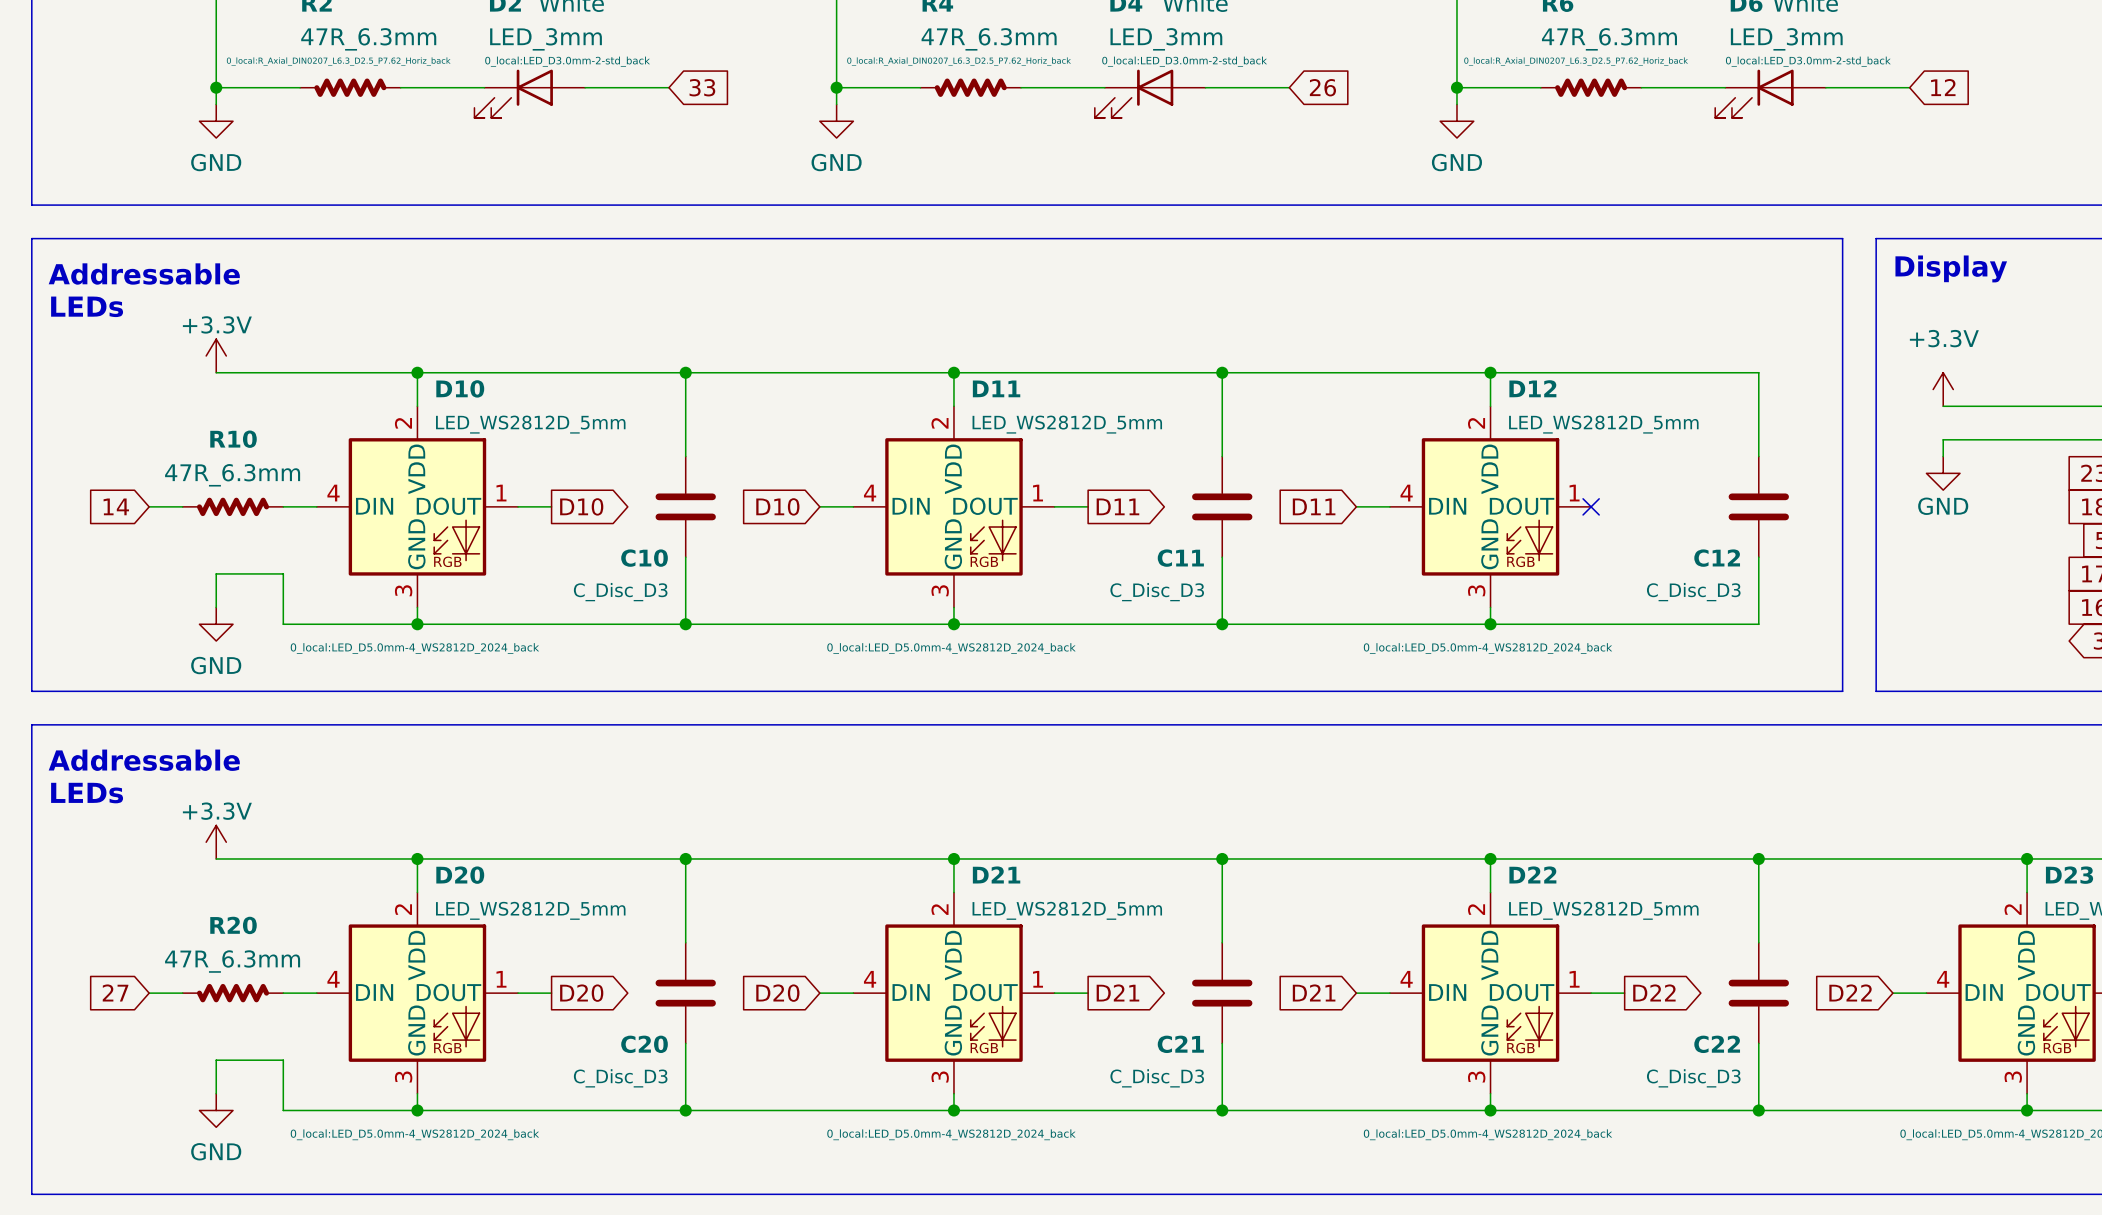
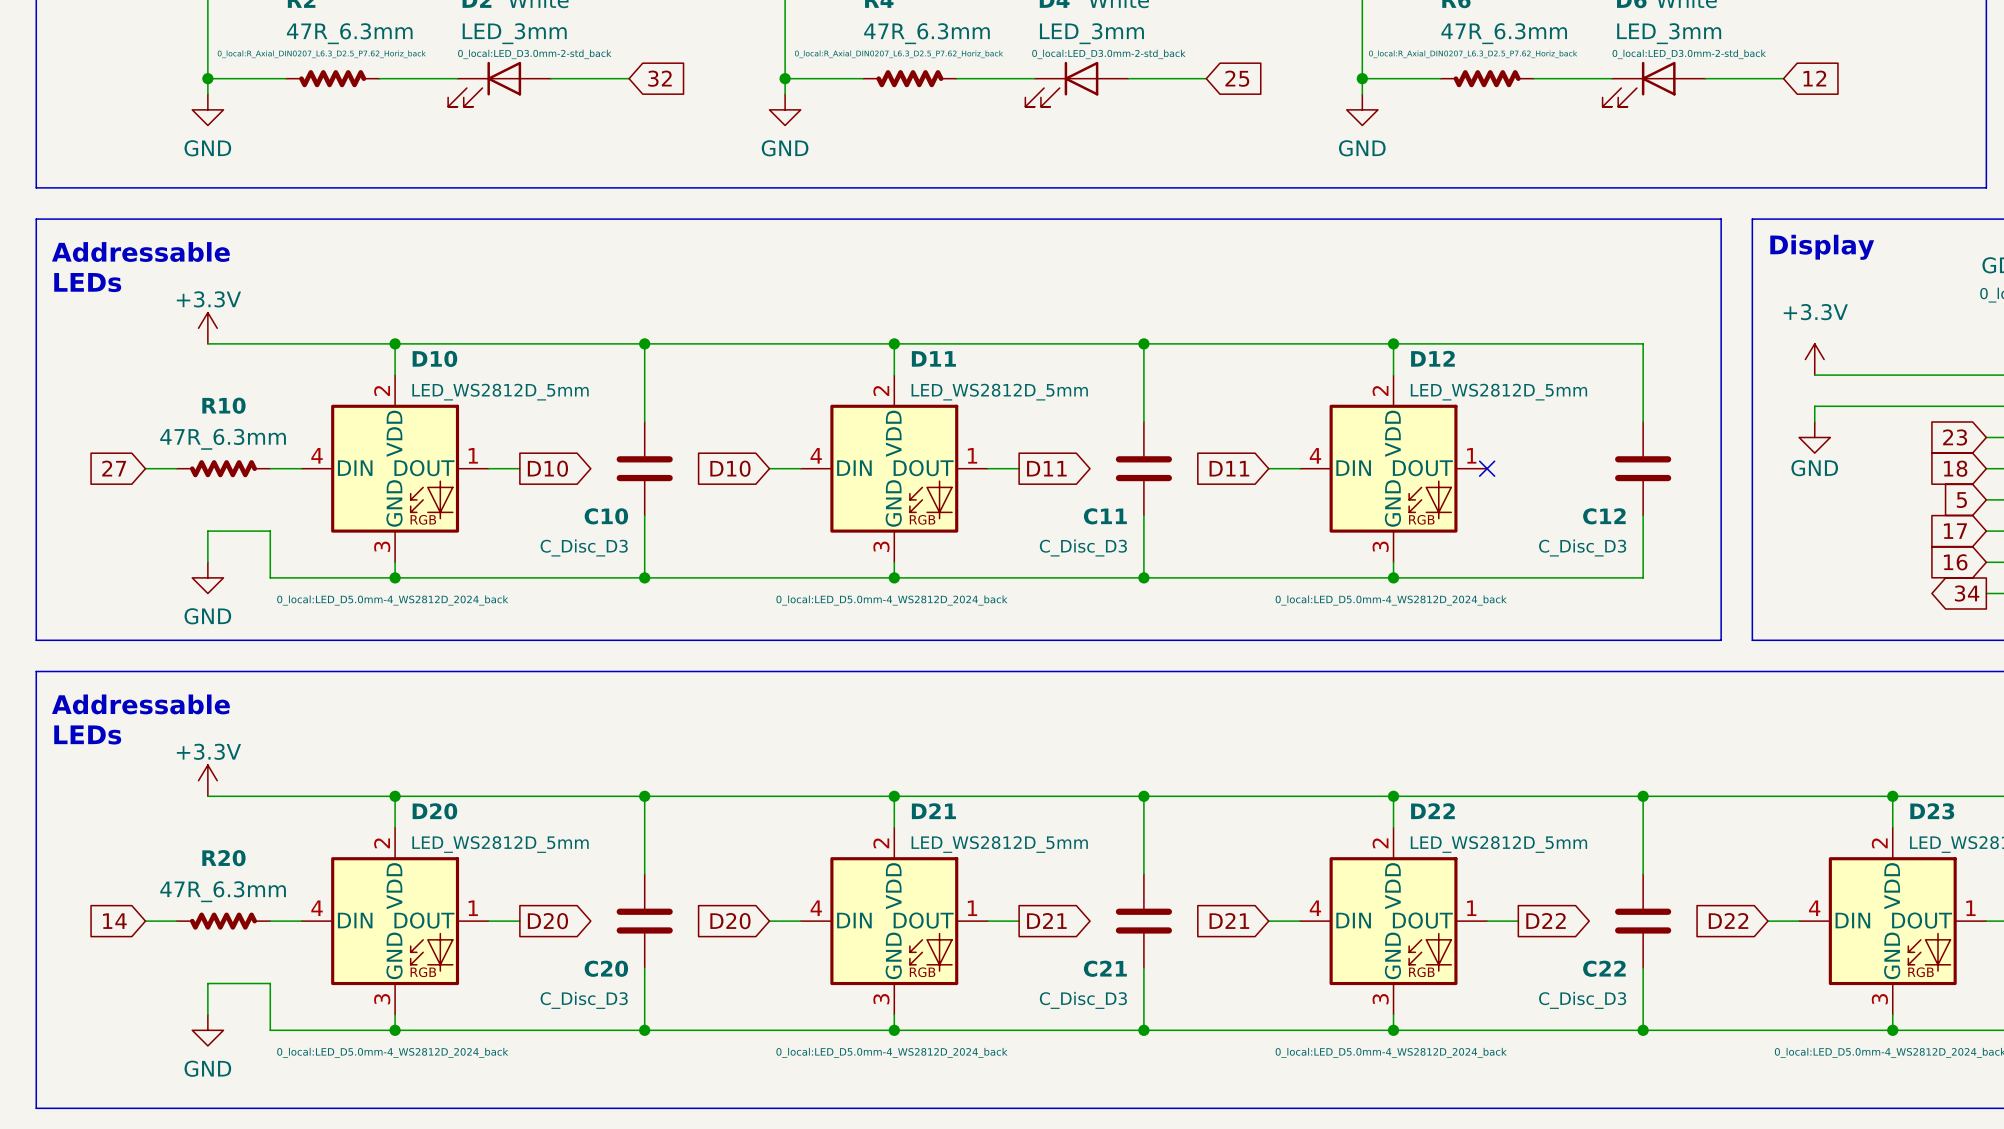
global label: 33 (702, 87) -> 32 (660, 78)
global label: 26 (1322, 87) -> 25 (1237, 78)
global label: 14 (116, 506) -> 27 (114, 468)
global label: 27 (115, 992) -> 14 (114, 921)

